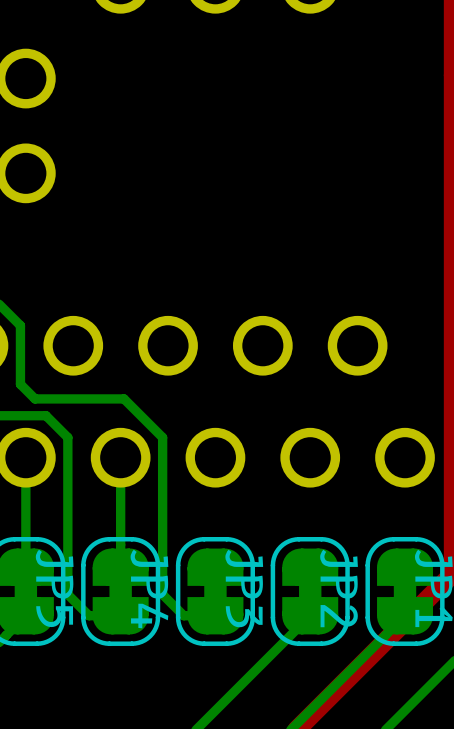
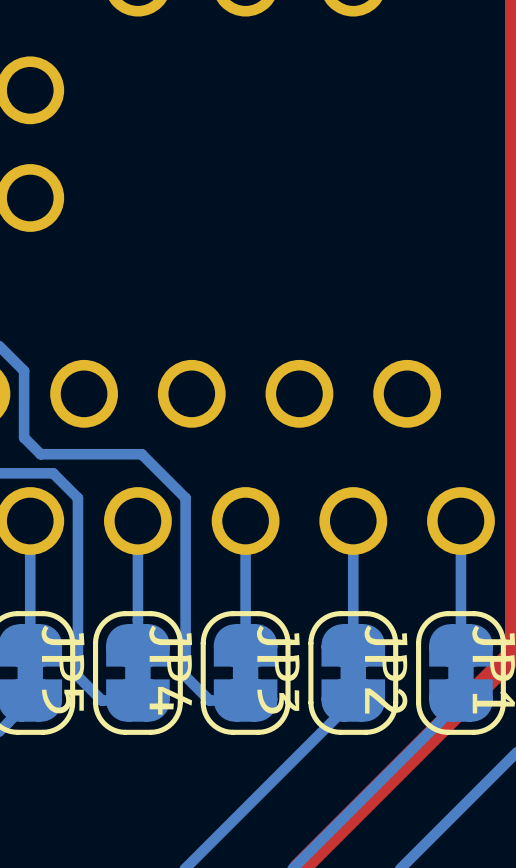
bottom track: none -> (245, 521) (245, 645)
bottom track: none -> (353, 521) (353, 645)
bottom track: none -> (460, 521) (460, 645)

